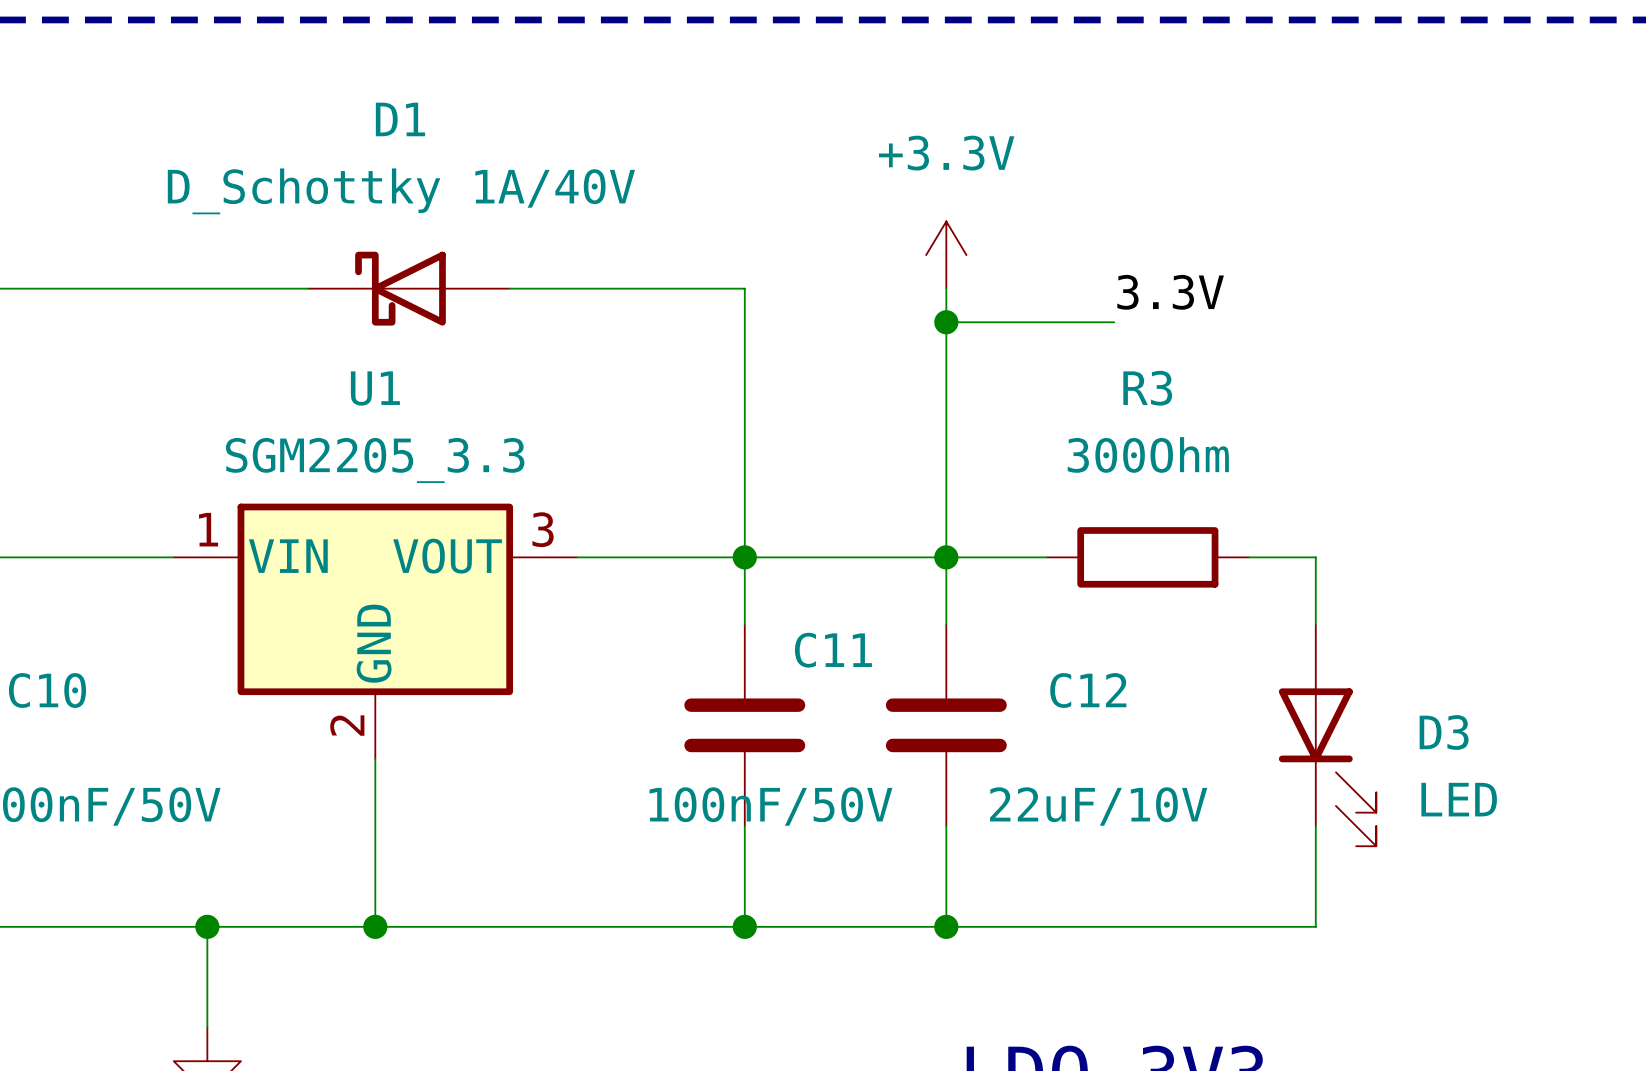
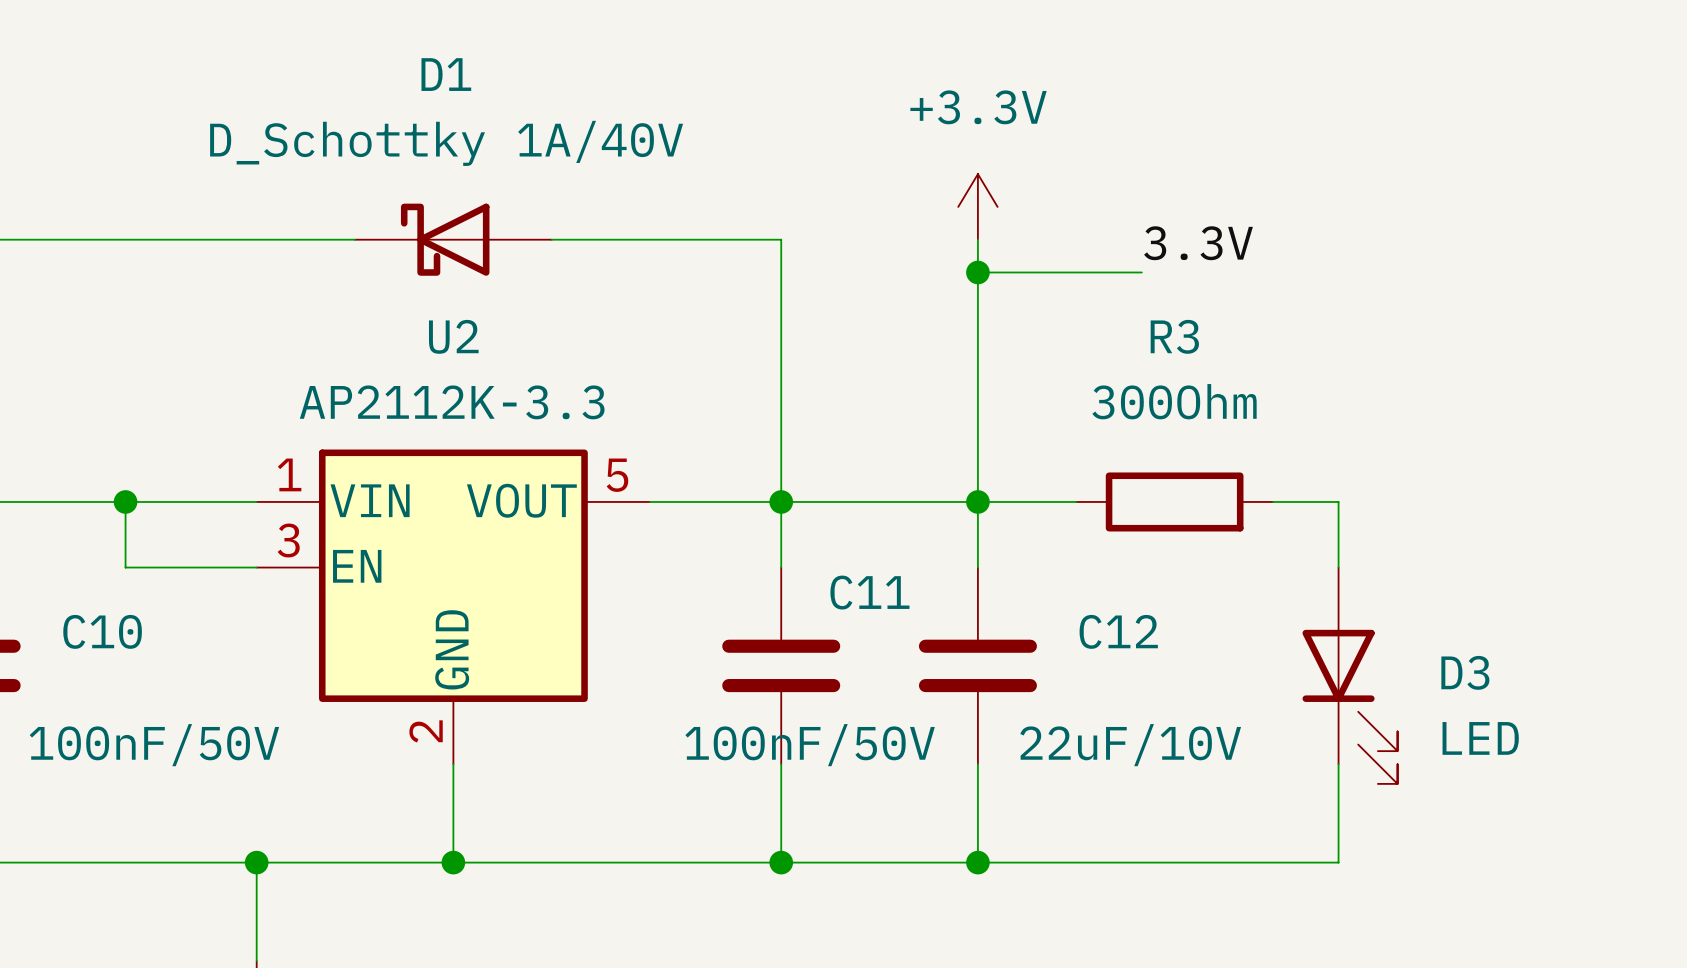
wire: none -> (125, 501) (125, 567) (256, 567)
junction: none -> (125, 501)
U1: SGM2205_3.3 (375, 631) -> none
U2: none -> AP2112K-3.3 (453, 606)
wire: (375, 758) (375, 926) -> none
wire: none -> (453, 764) (453, 862)
junction position: (375, 926) -> (453, 862)

